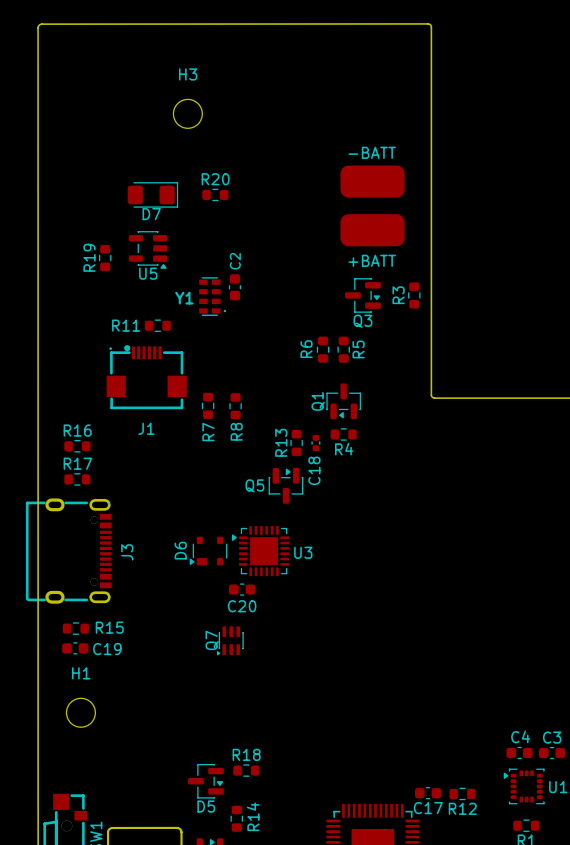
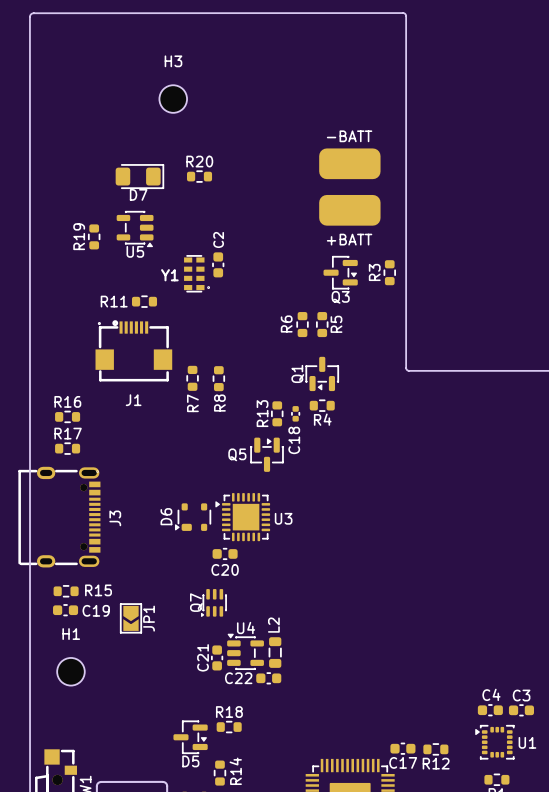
JP1: none -> (131, 618)
U4: none -> (245, 651)
L2: none -> (275, 652)
C21: none -> (217, 657)
C22: none -> (268, 678)

